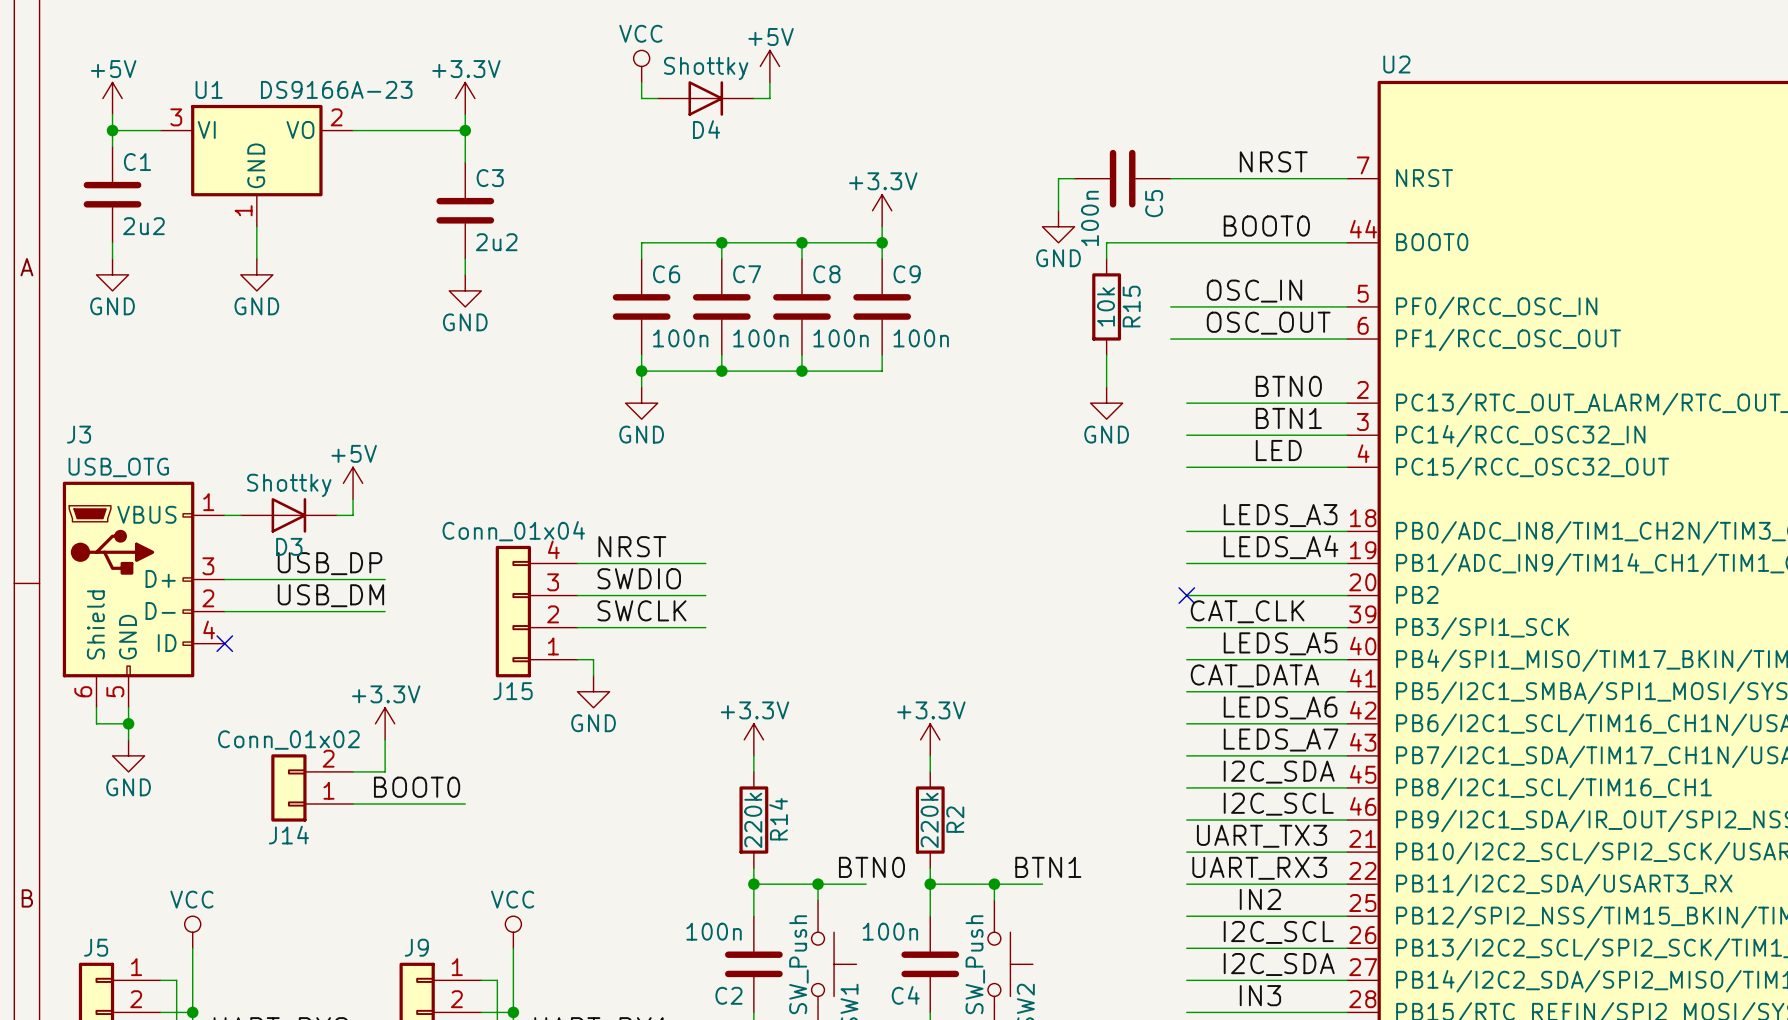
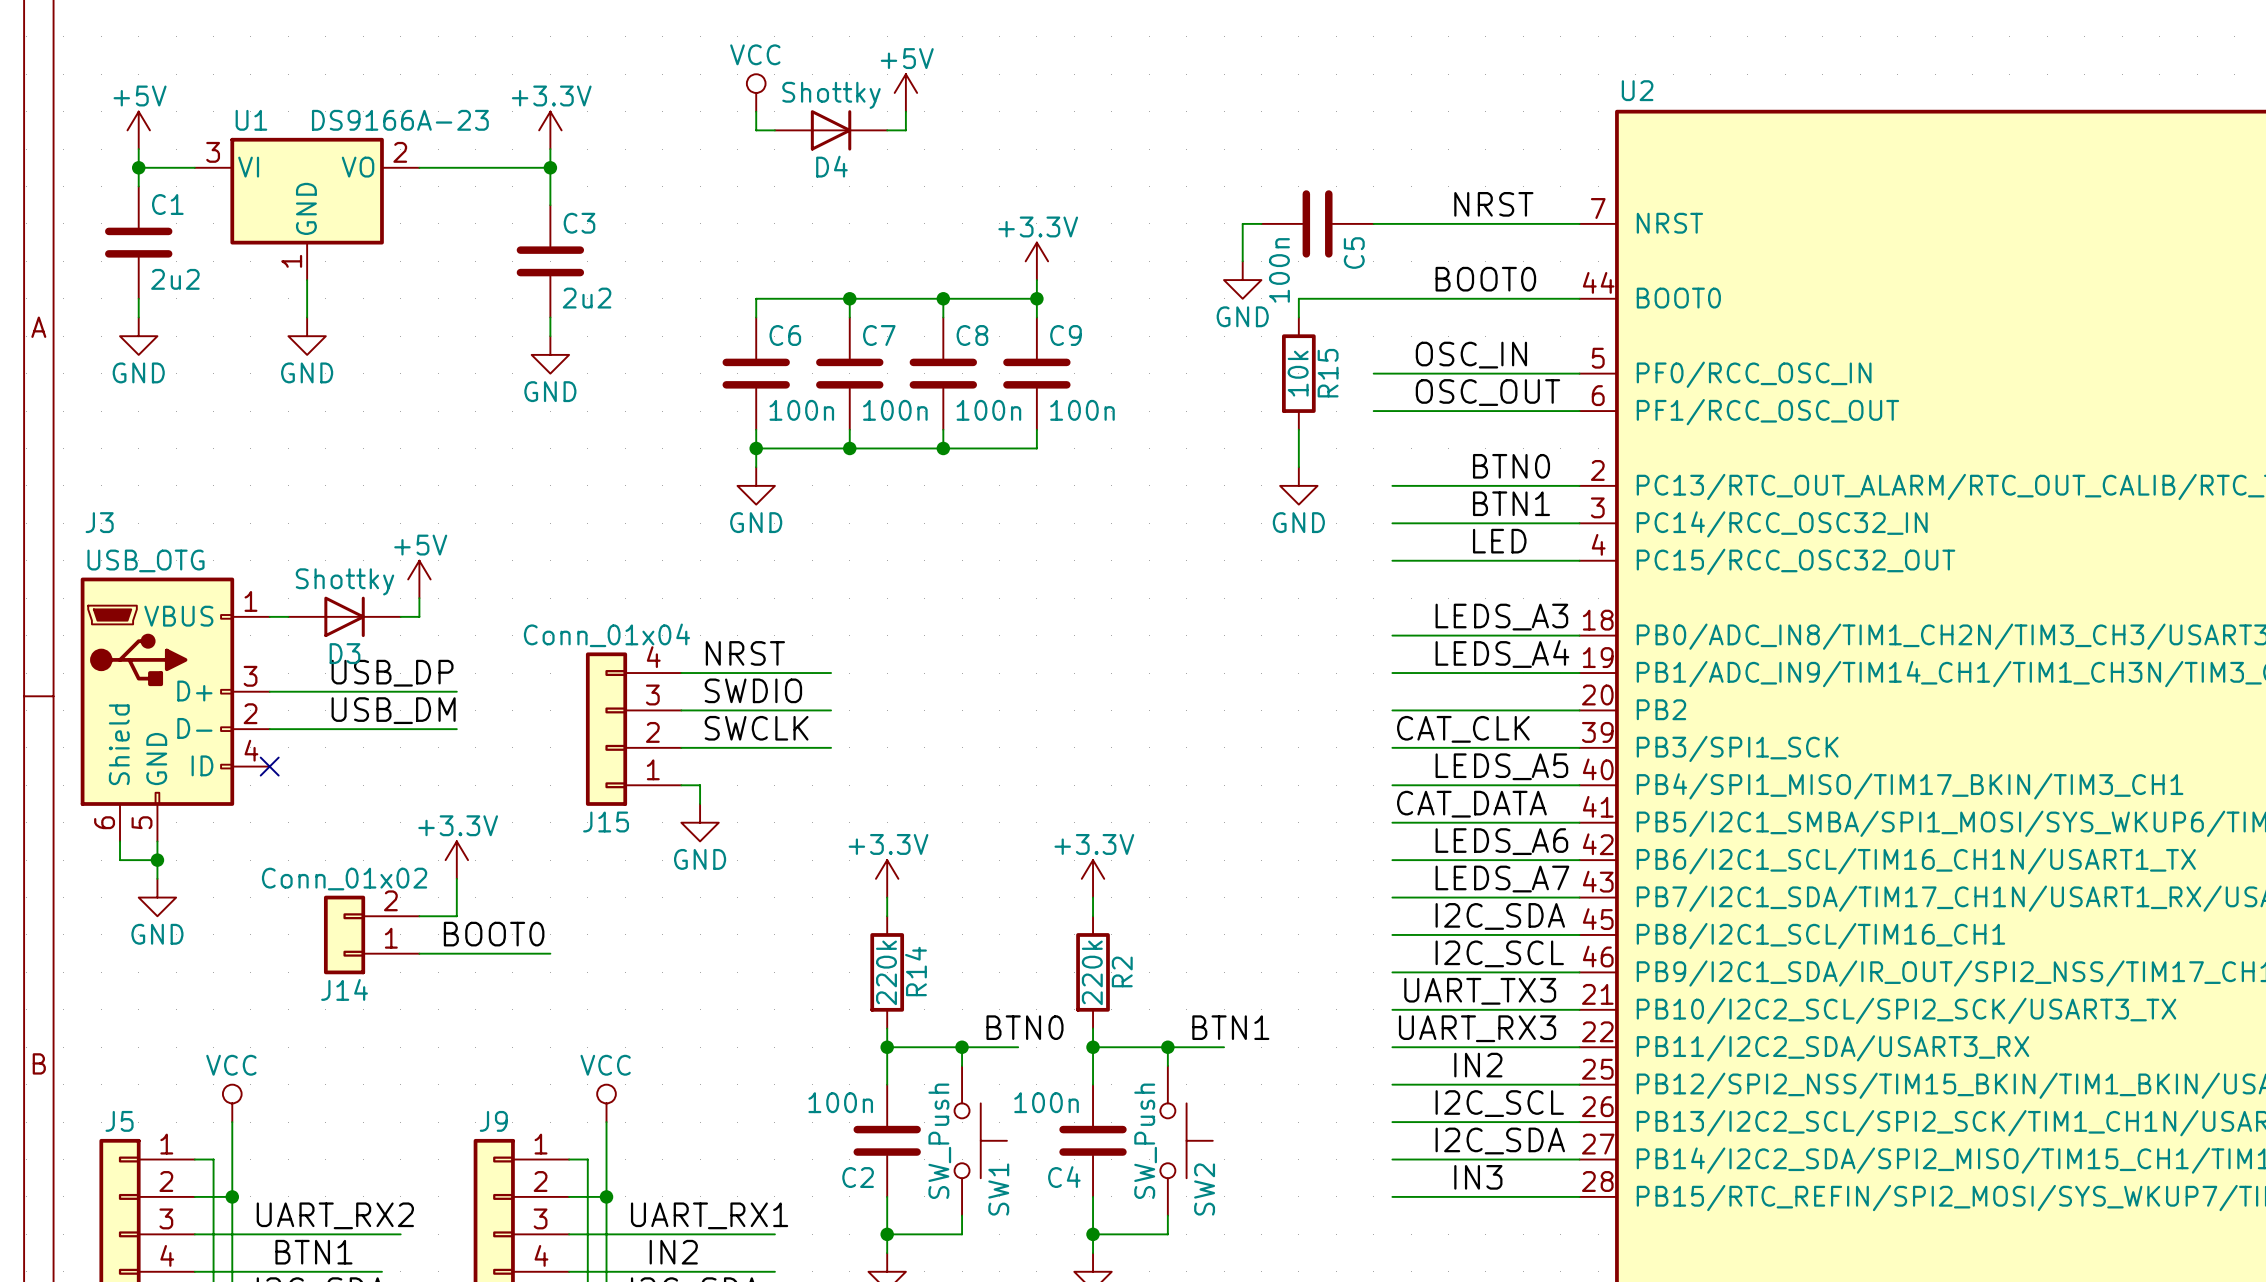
no-connect mark: (1186, 595) -> none

